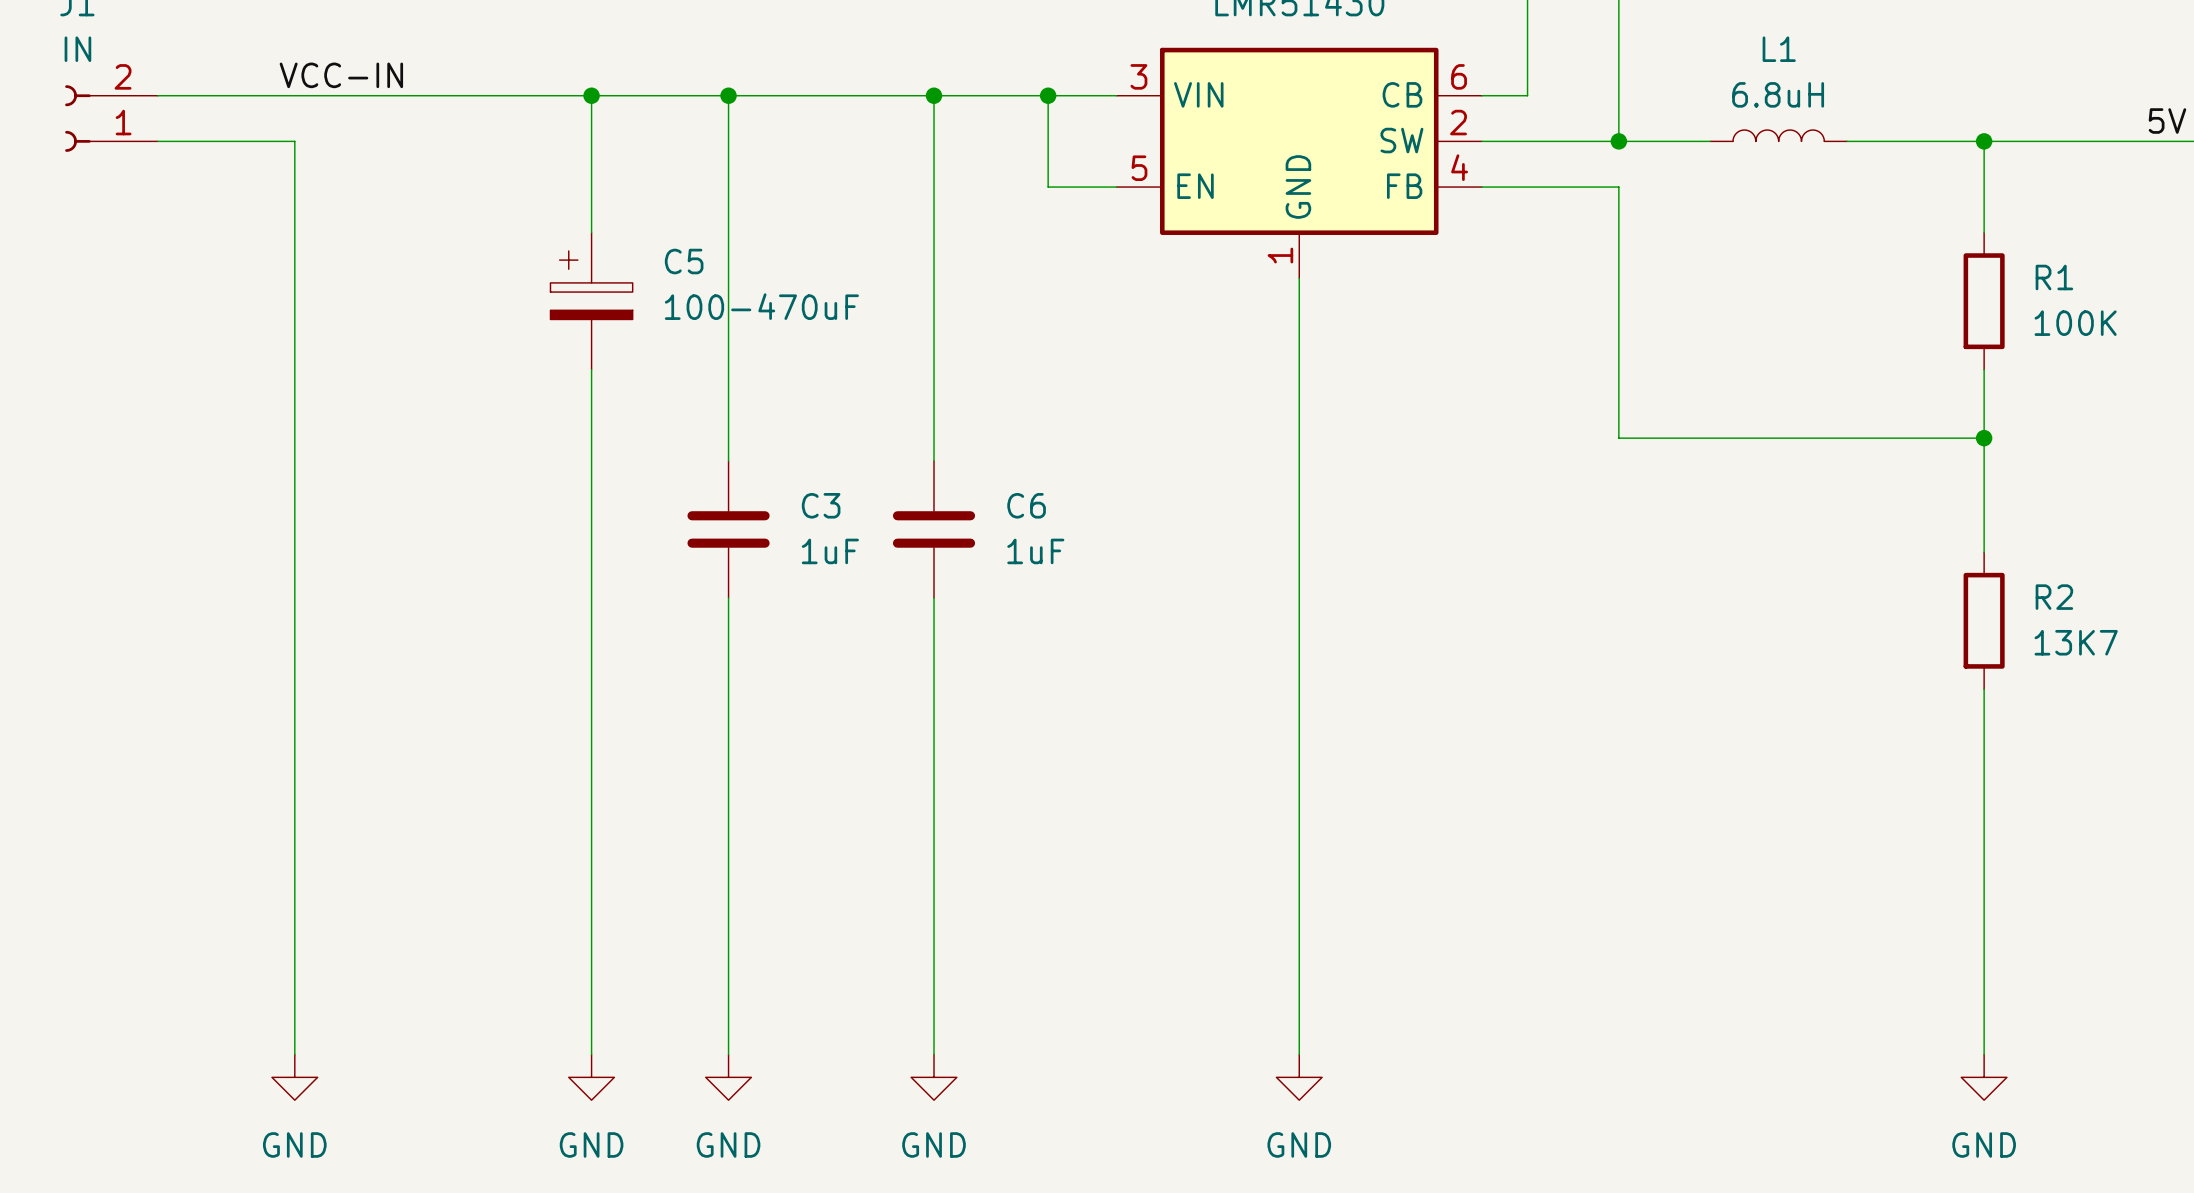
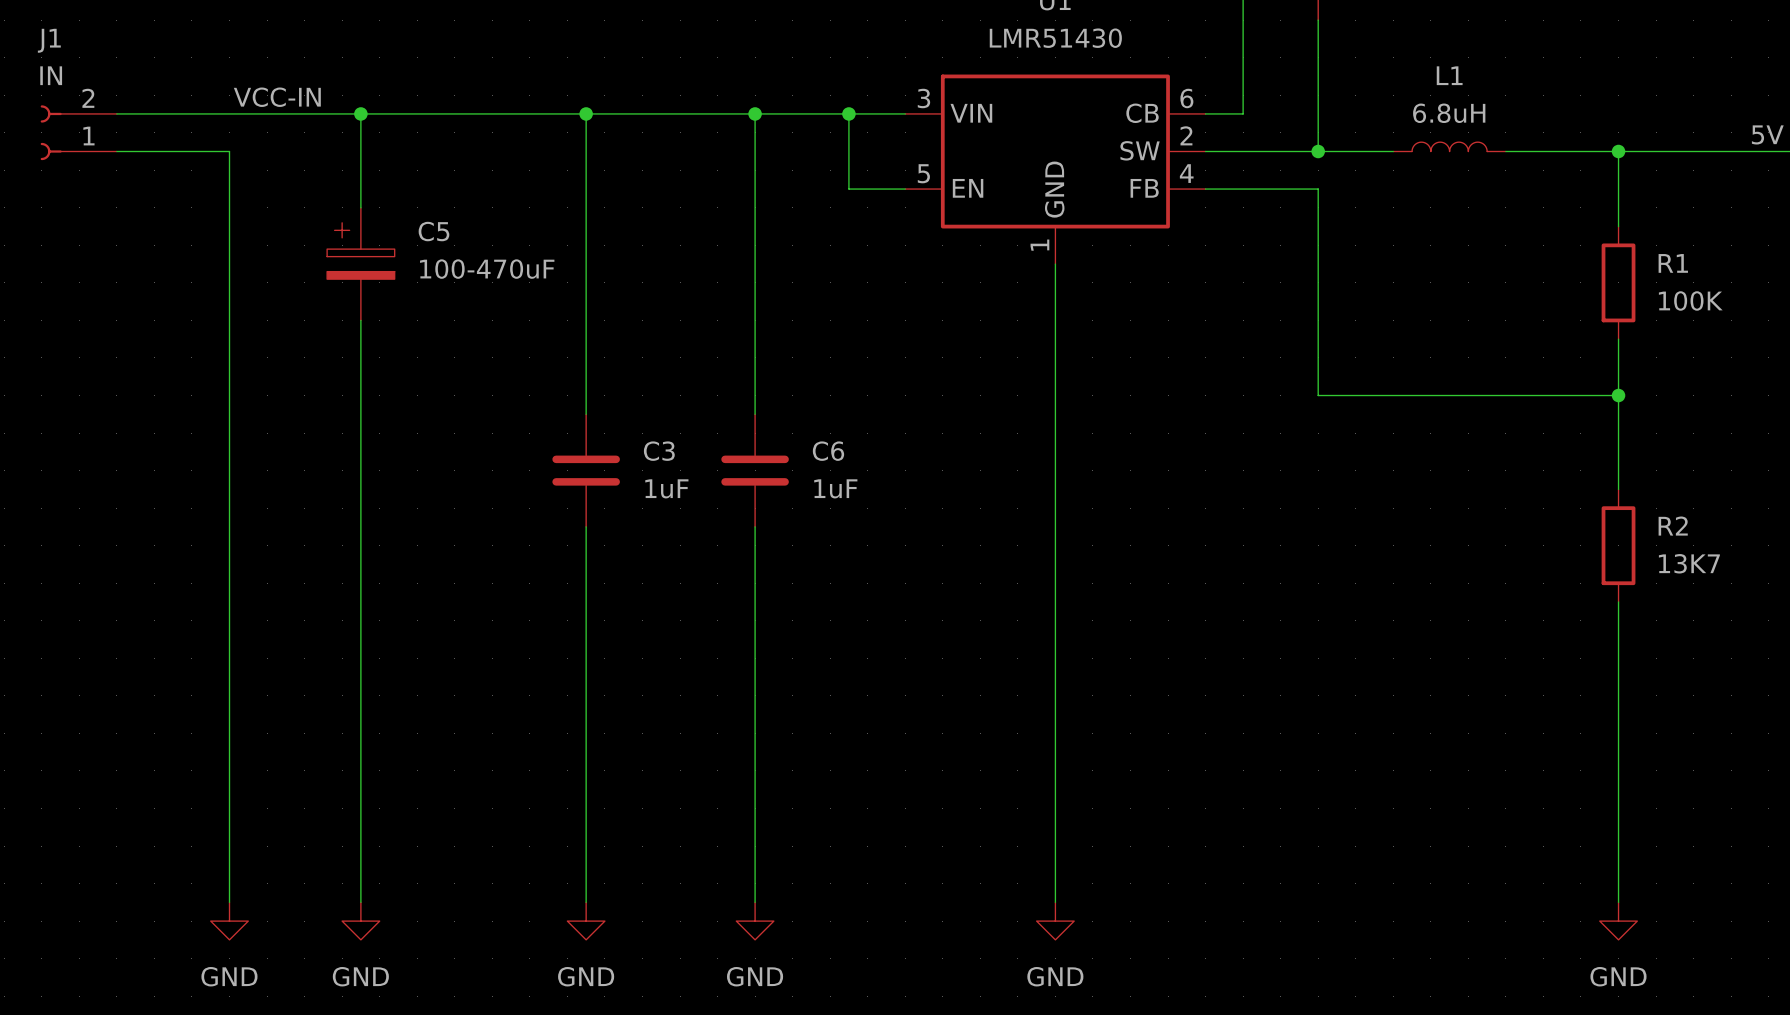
wire: none -> (360, 113) (360, 207)
junction: none -> (360, 113)
wire: (591, 95) (591, 232) -> none
junction: (591, 95) -> none
C5 position: (591, 301) -> (360, 264)
wire: none -> (360, 320) (360, 902)
wire: (591, 369) (591, 1054) -> none
power symbol position: GND (591, 1077) -> GND (360, 921)

